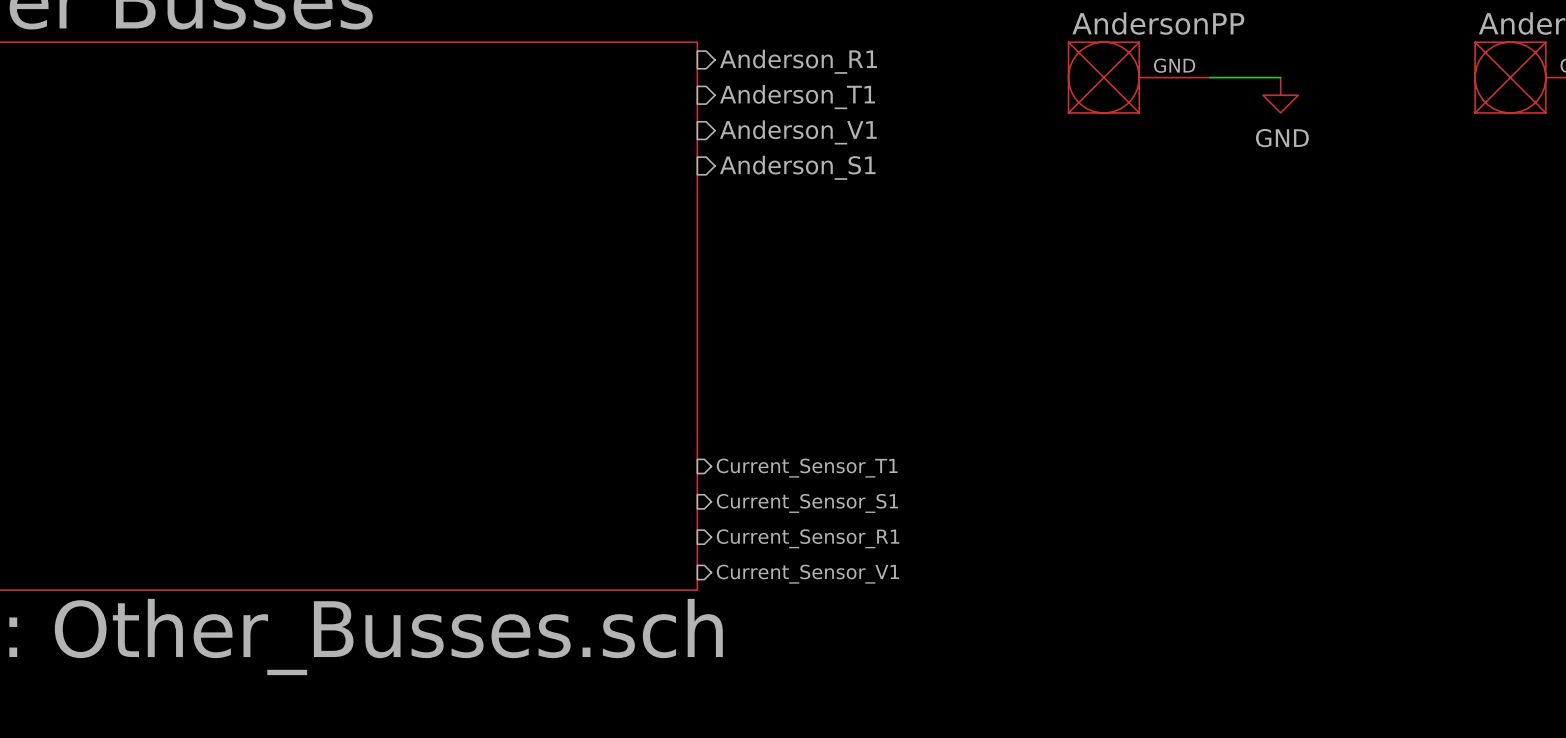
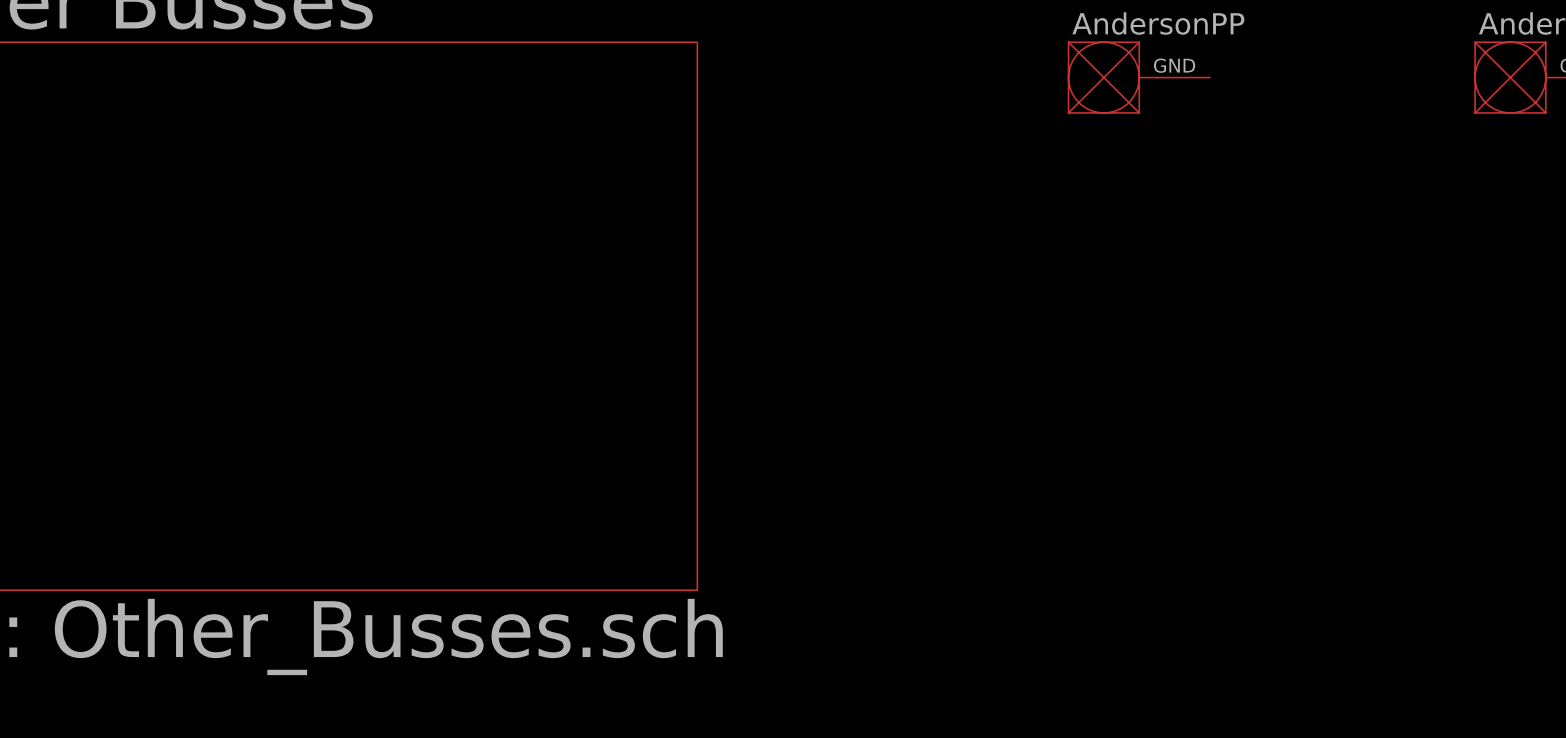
hierarchical label: Anderson_R1 (798, 61) -> none
wire: (1209, 77) (1280, 77) -> none
power symbol: GND (1280, 95) -> none
hierarchical label: Anderson_T1 (797, 97) -> none
hierarchical label: Anderson_V1 (798, 132) -> none
hierarchical label: Anderson_S1 (797, 167) -> none
hierarchical label: Current_Sensor_T1 (807, 468) -> none
hierarchical label: Current_Sensor_S1 (807, 503) -> none
hierarchical label: Current_Sensor_R1 (808, 538) -> none
hierarchical label: Current_Sensor_V1 (807, 574) -> none

